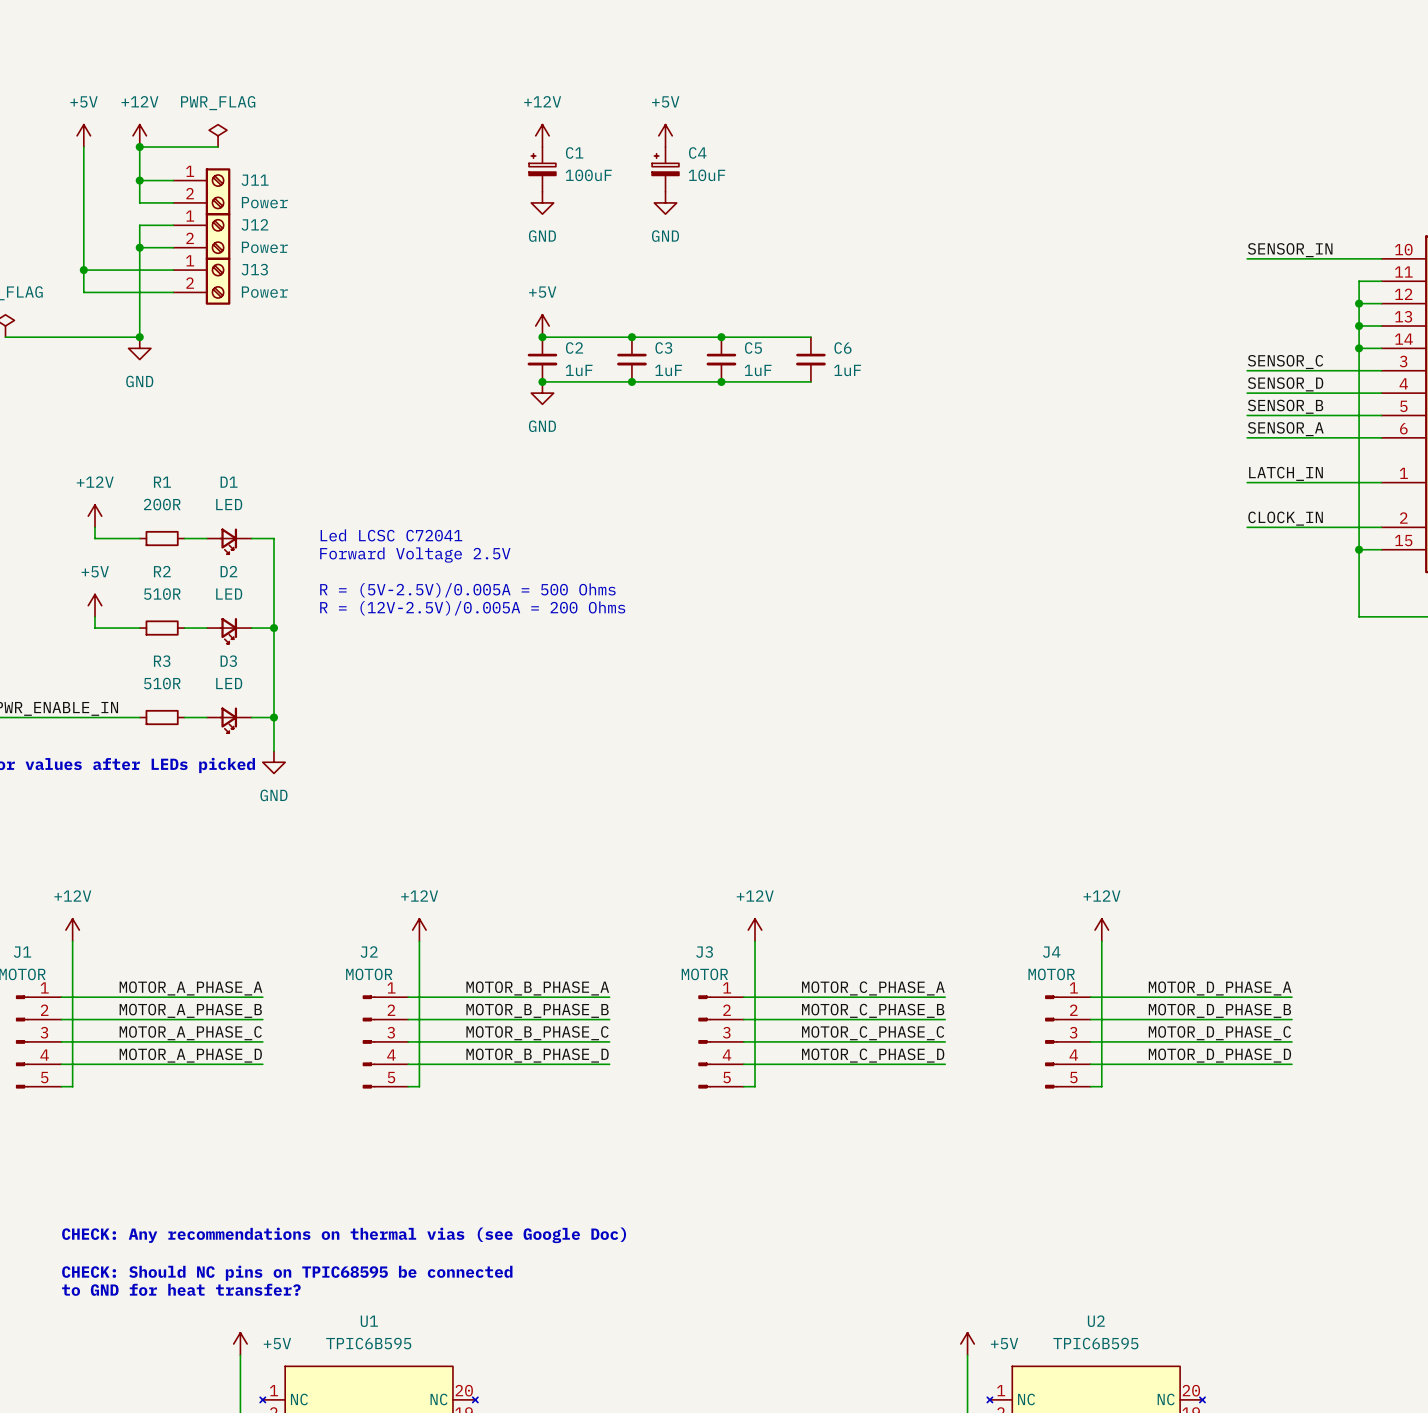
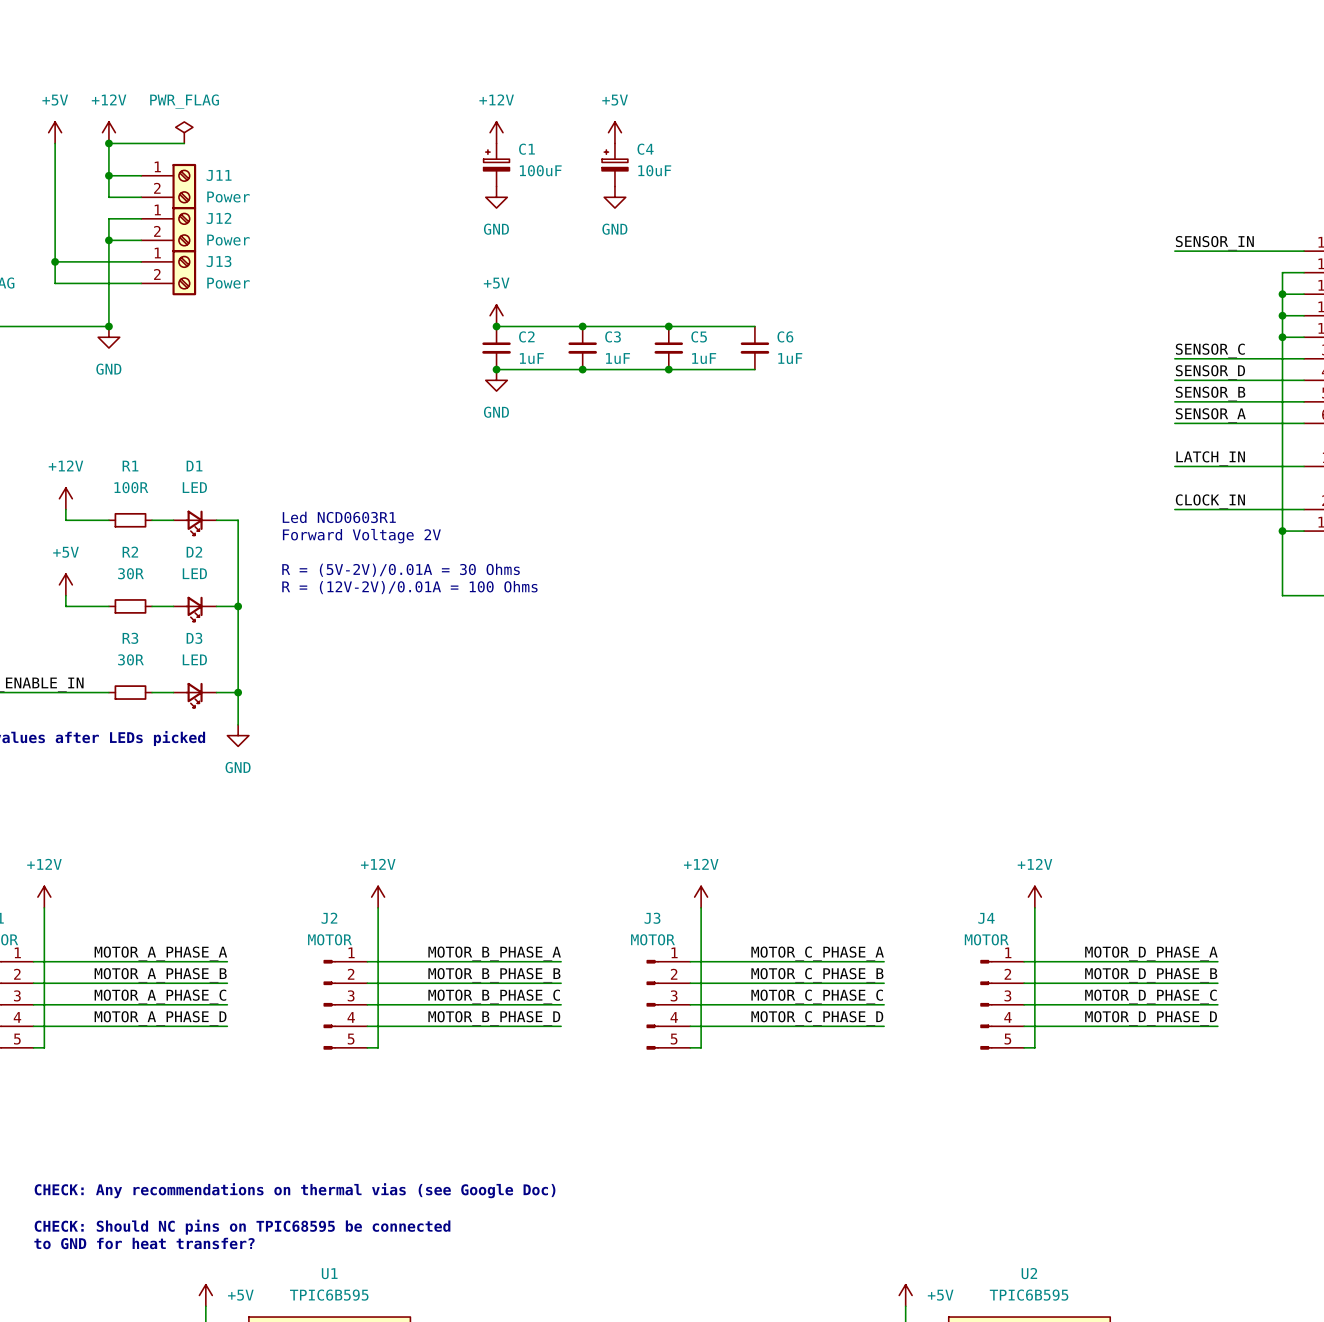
R1 value: 200R (162, 504) -> 100R (131, 487)
text: Led LCSC C72041 (391, 535) -> Led NCD0603R1 (339, 517)
text: Forward Voltage 2.5V (415, 555) -> Forward Voltage 2V (361, 536)
text: R = (5V-2.5V)/0.005A = 500 Ohms (467, 590) -> R = (5V-2V)/0.01A = 30 Ohms (401, 570)
R2 value: 510R (162, 594) -> 30R (130, 573)
text: R = (12V-2.5V)/0.005A = 200 Ohms (472, 608) -> R = (12V-2V)/0.01A = 100 Ohms (409, 587)
R3 value: 510R (162, 683) -> 30R (130, 659)

